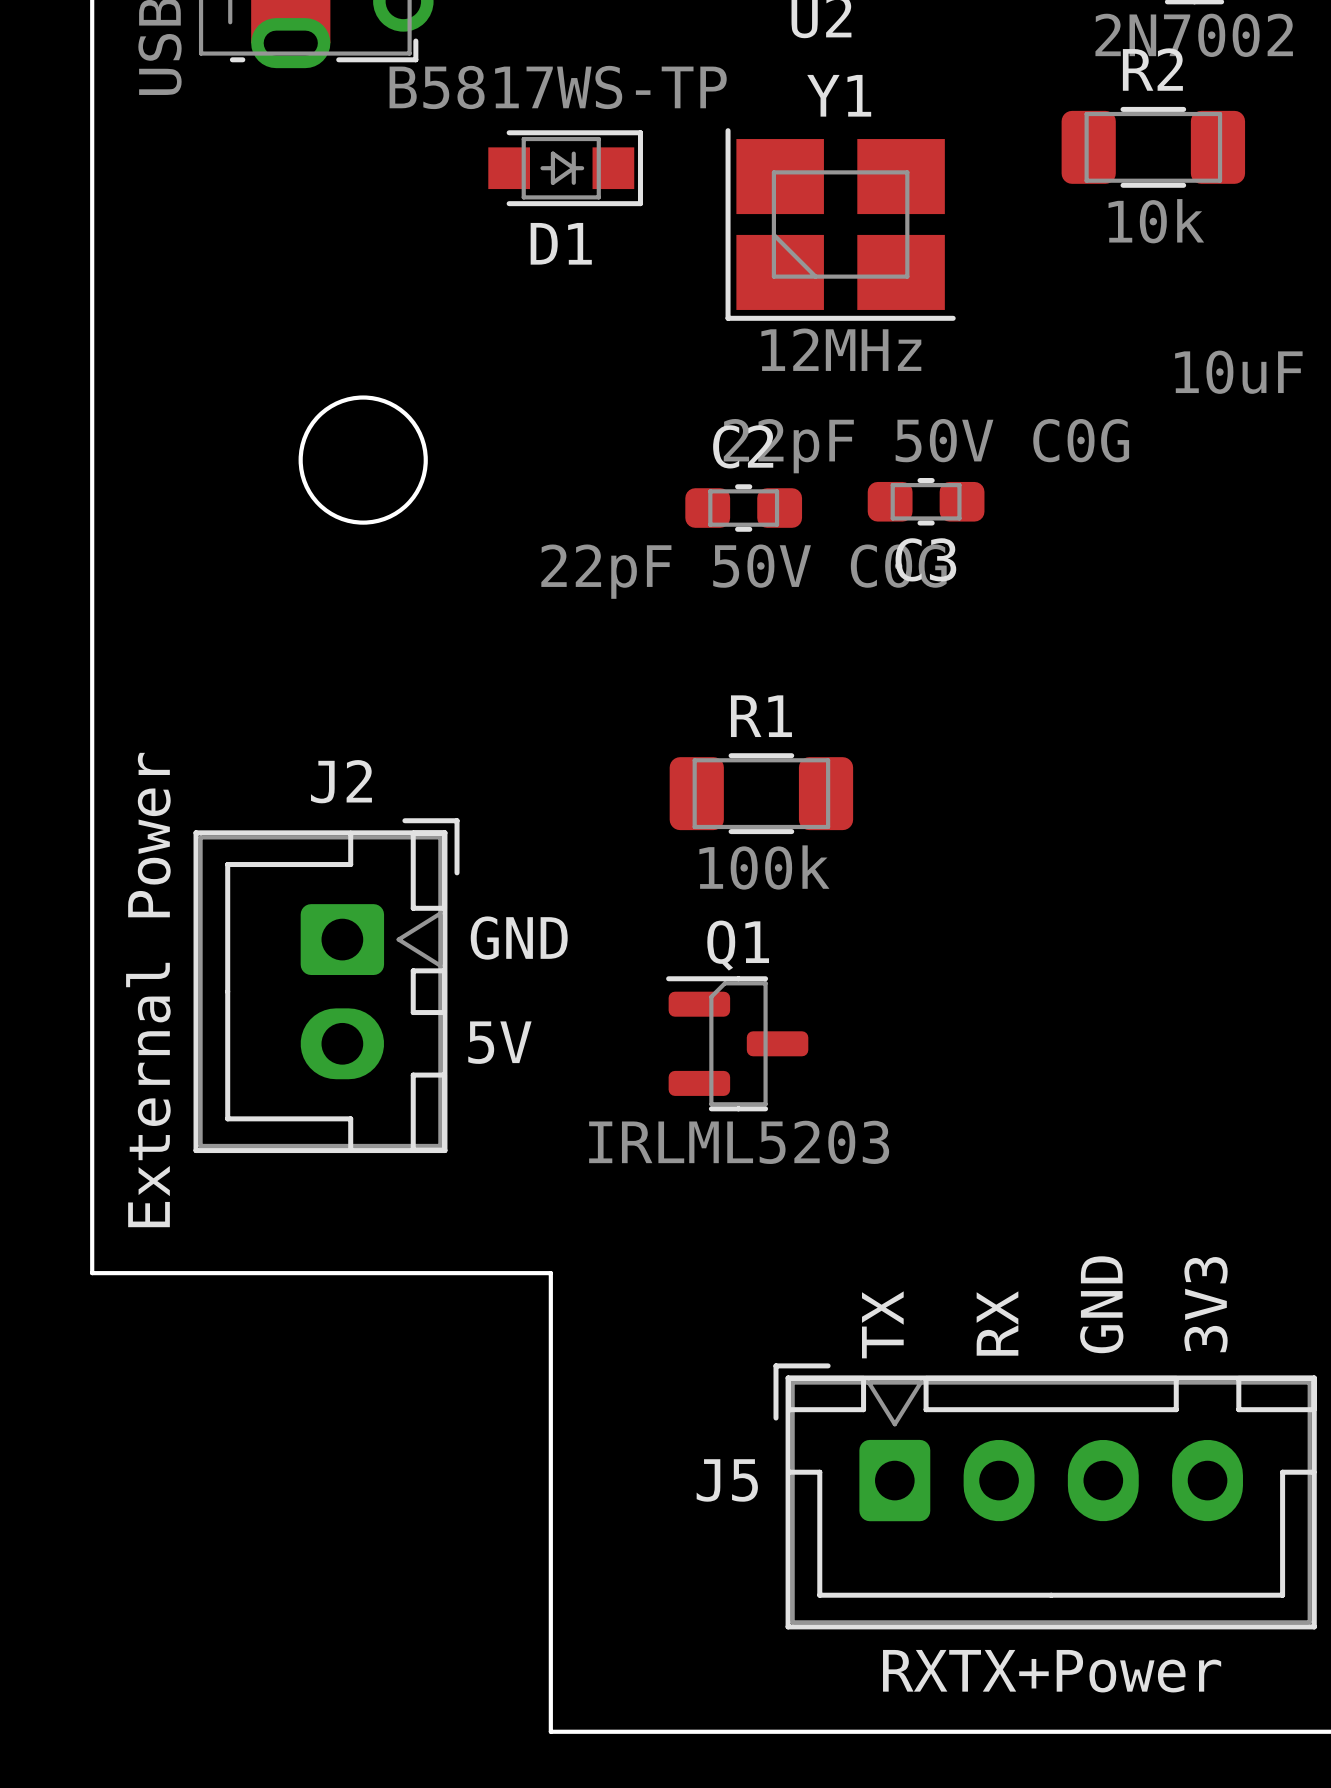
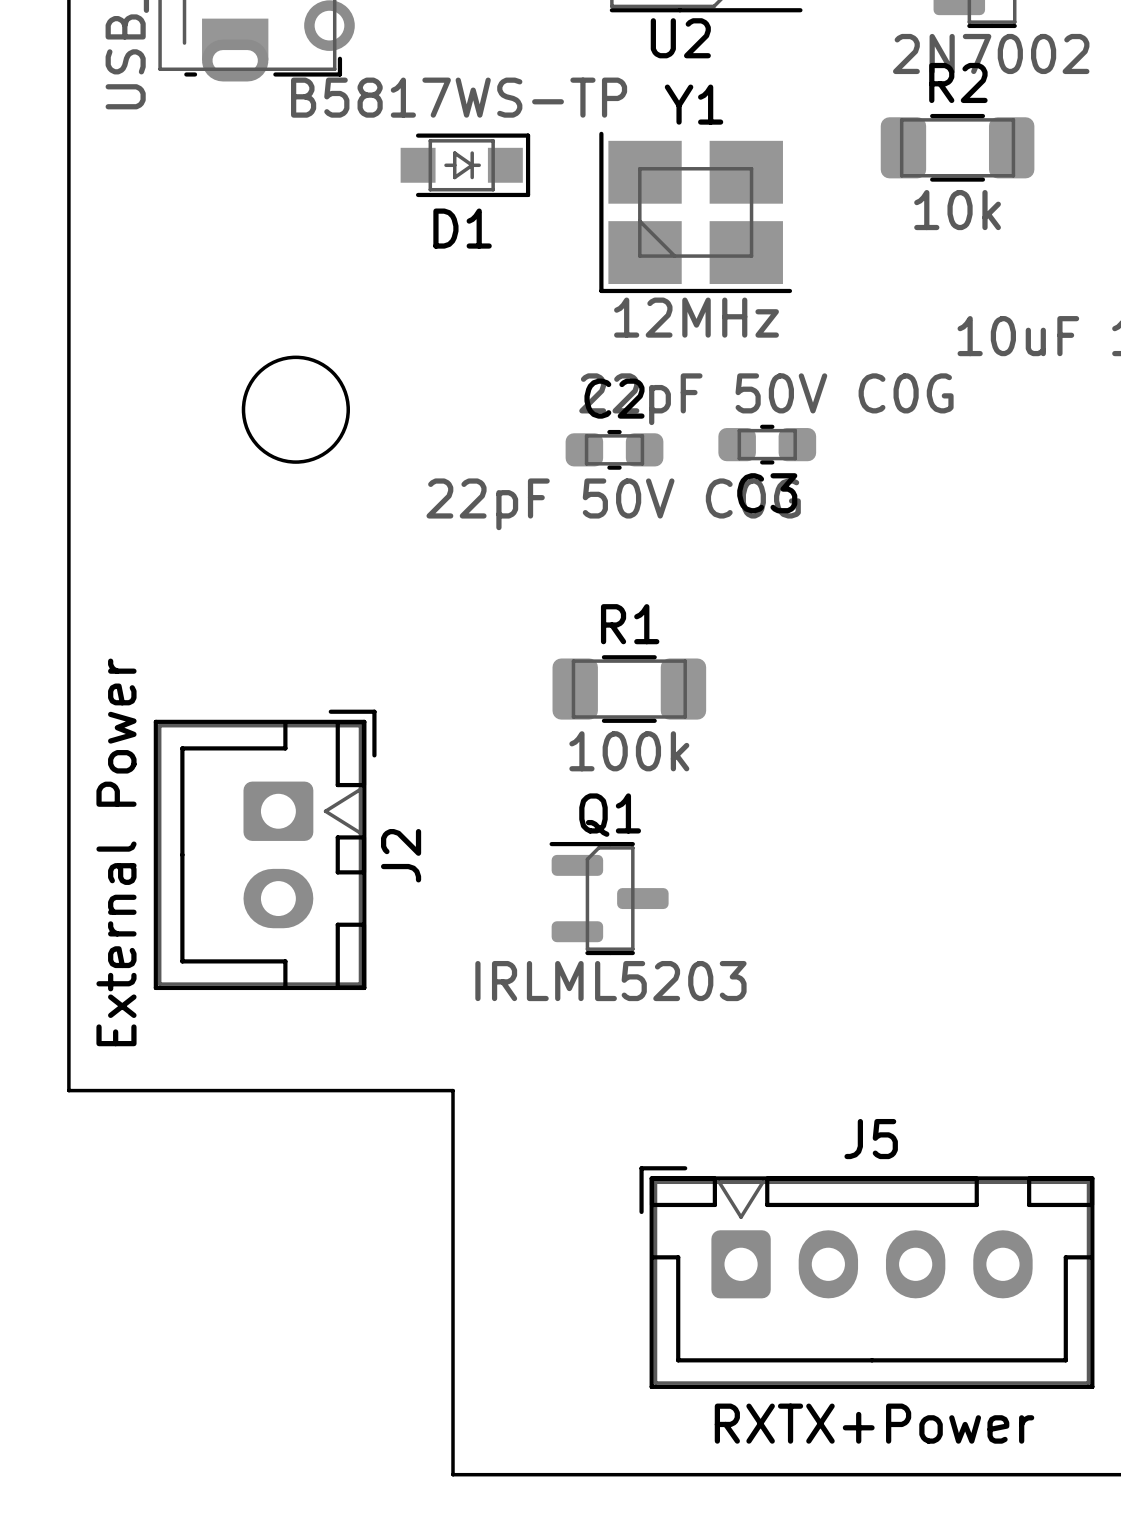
J2 name rotation: 0° (341, 781) -> 90° counterclockwise (401, 855)
J2 name position: J2 (341, 781) -> J2 (401, 855)
text: GND (519, 938) -> none
text: 5V (499, 1042) -> none
text: GND (1101, 1304) -> none
text: 3V3 (1206, 1304) -> none
text: RX (997, 1323) -> none
text: TX (882, 1324) -> none
J5 name position: J5 (727, 1480) -> J5 (871, 1139)

